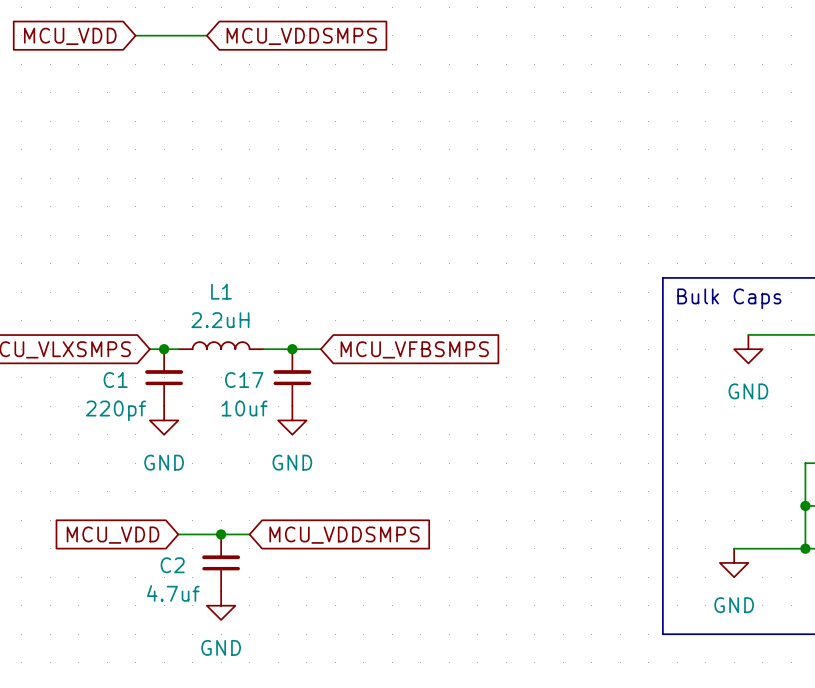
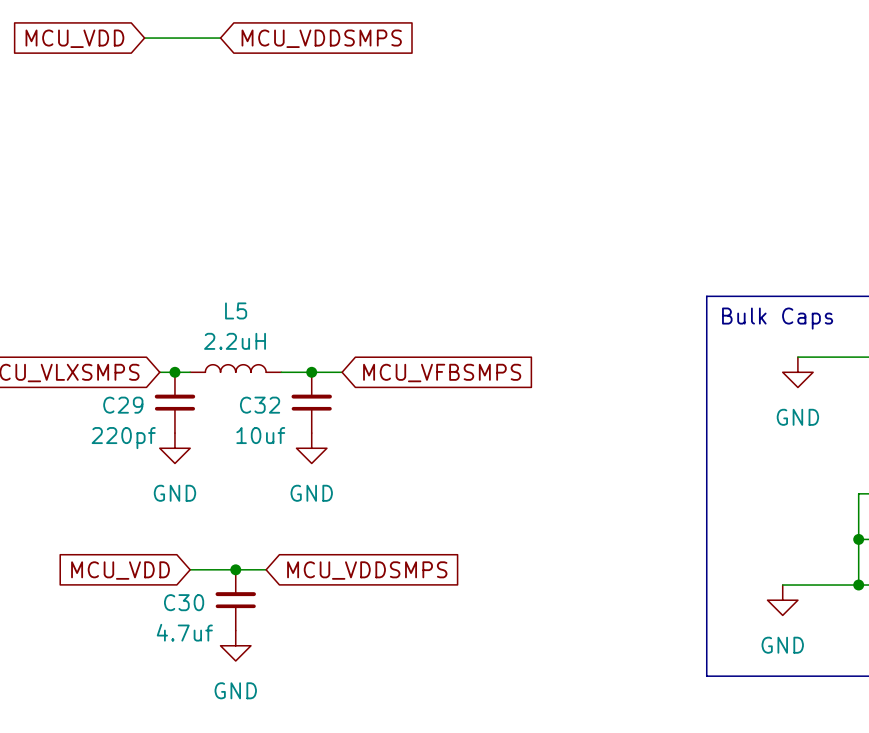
L1 name: L1 (221, 291) -> L5 (236, 310)
C1 name: C1 (115, 380) -> C29 (123, 405)
C17 name: C17 (244, 380) -> C32 (260, 405)
C2 name: C2 (172, 565) -> C30 (184, 602)

